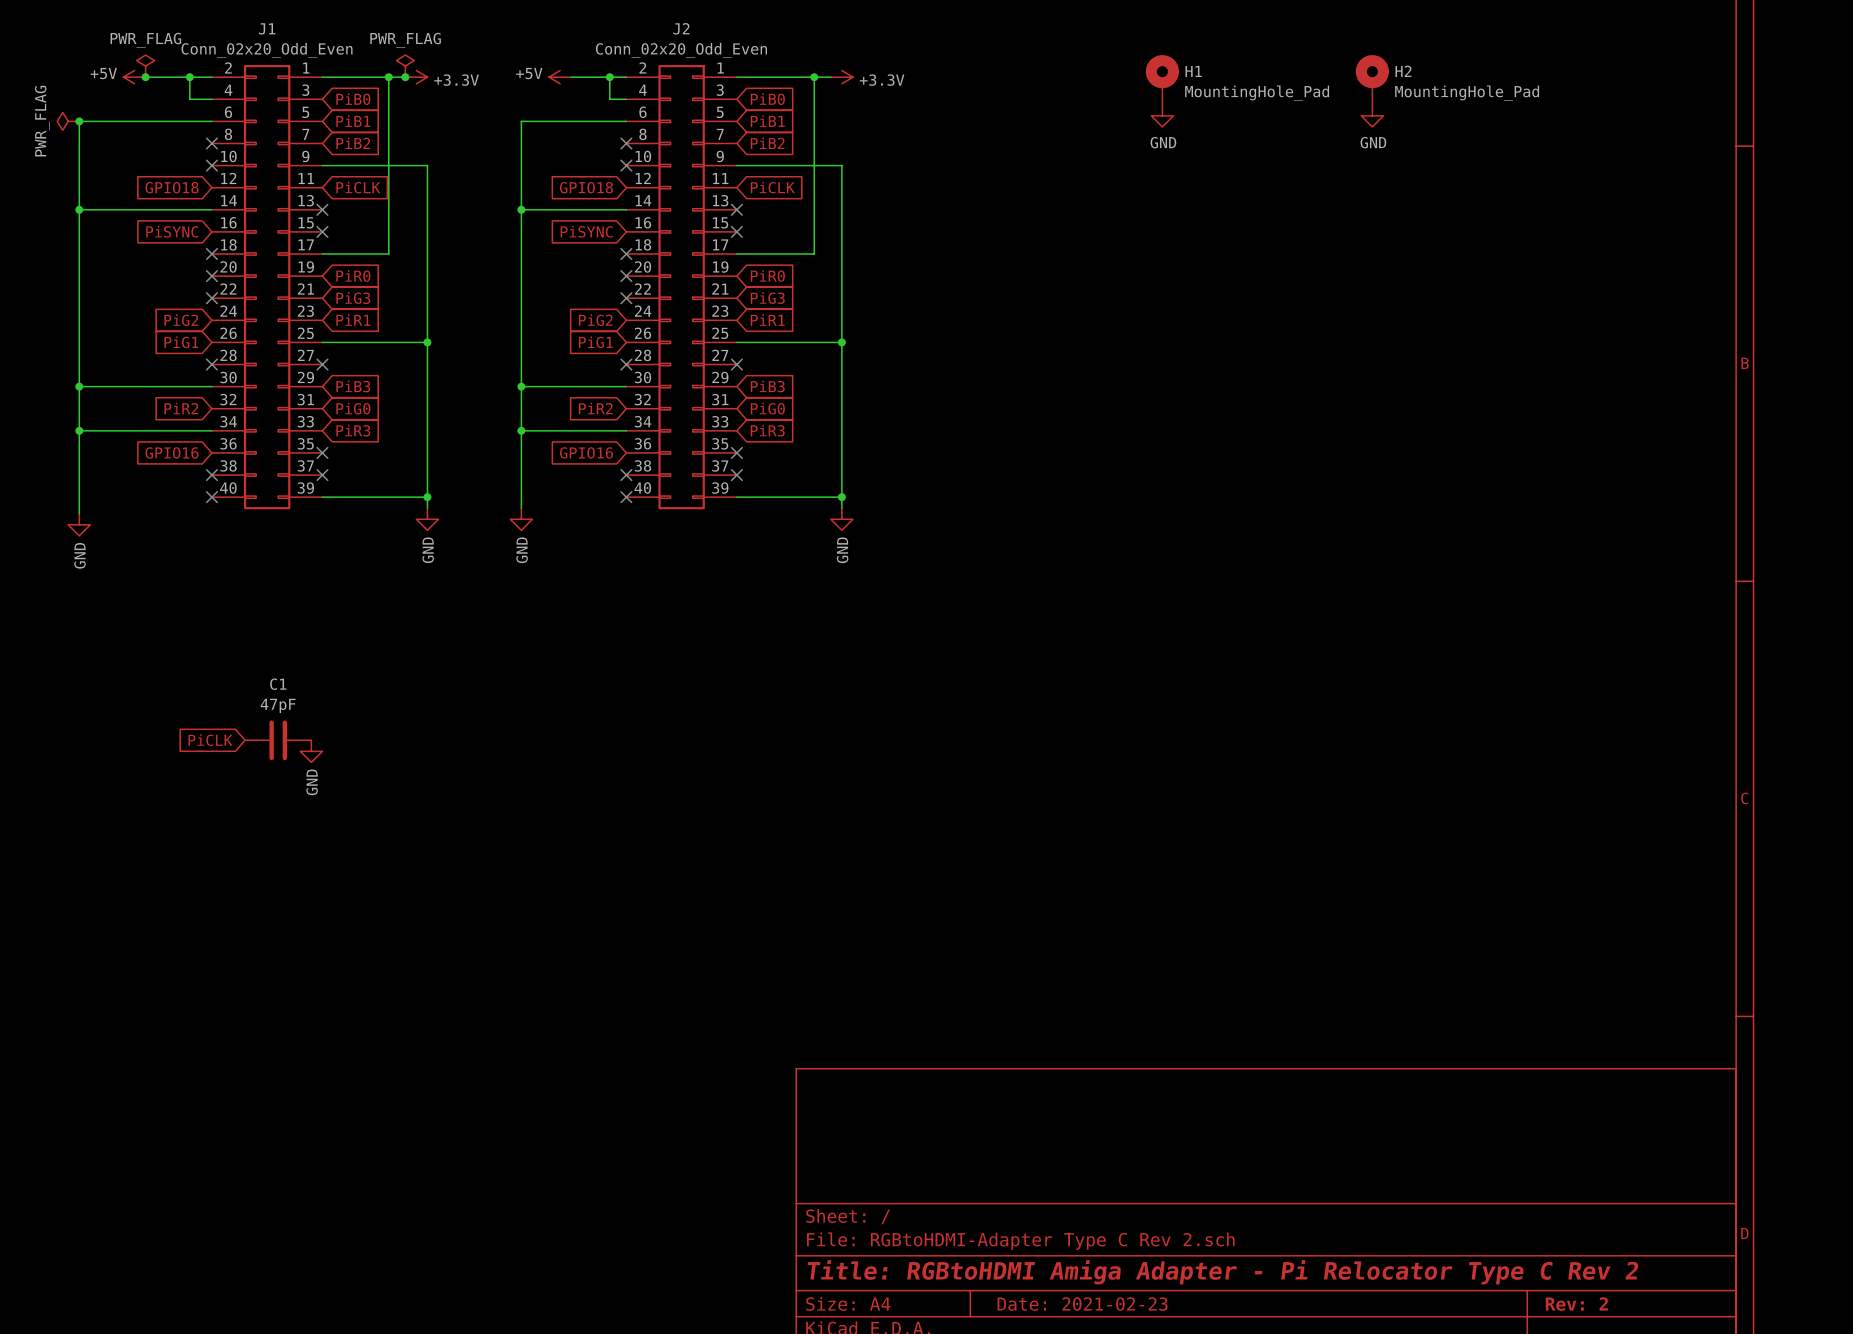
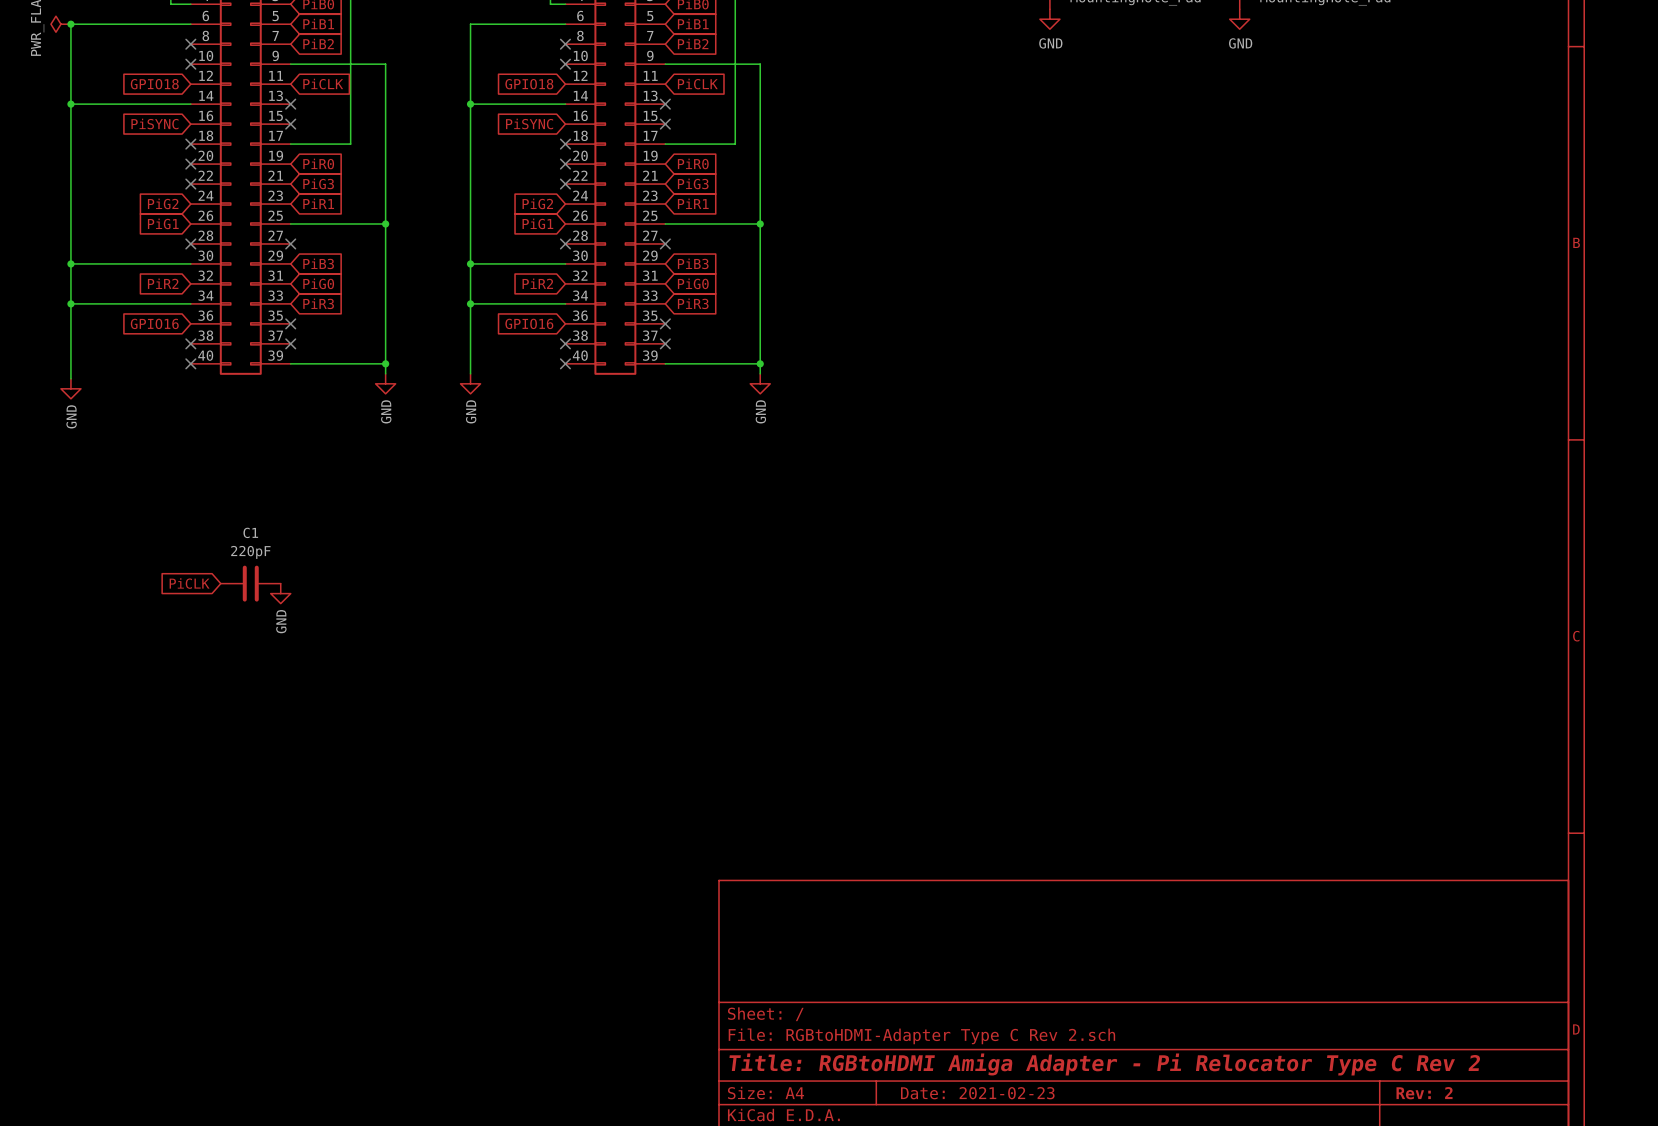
C1 value: 47pF (278, 705) -> 220pF (250, 552)

